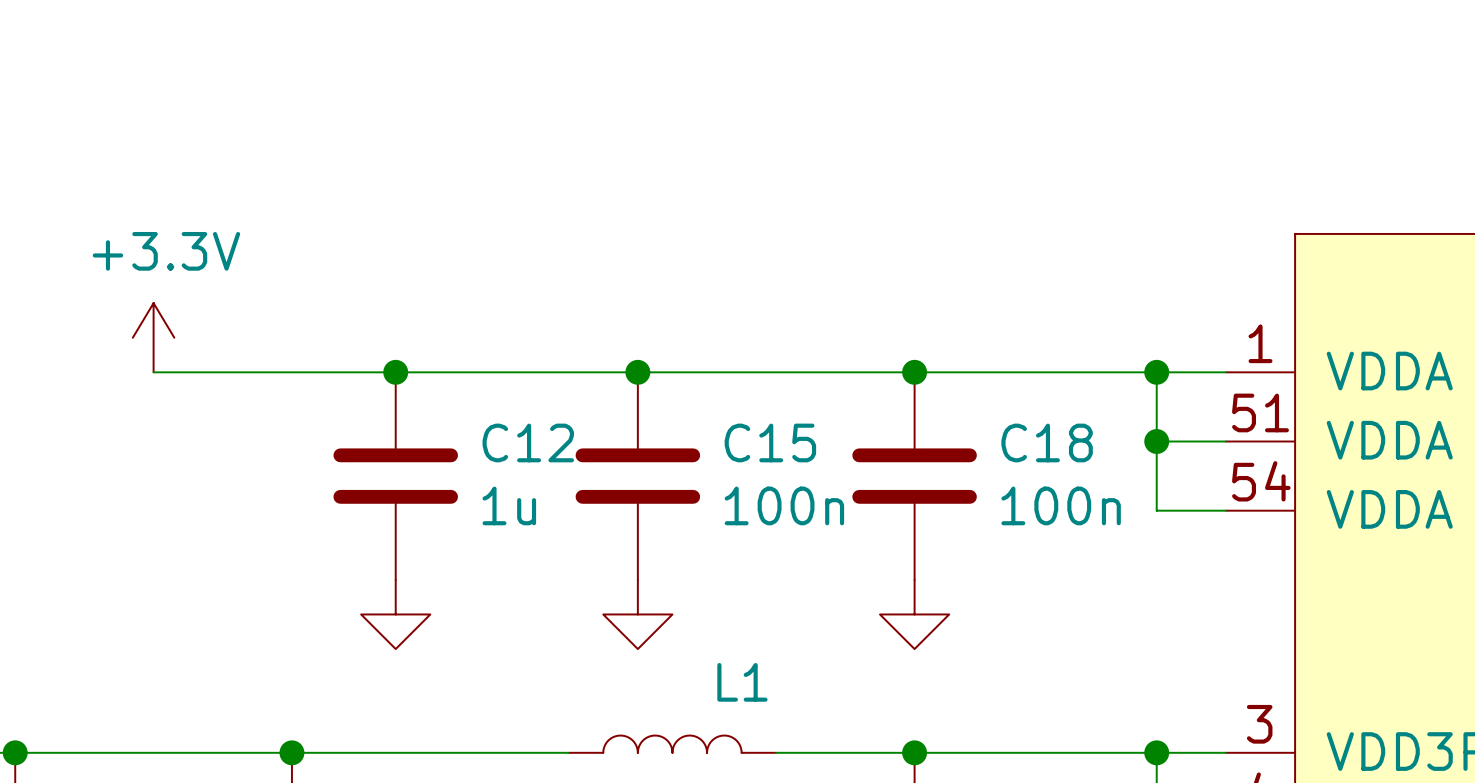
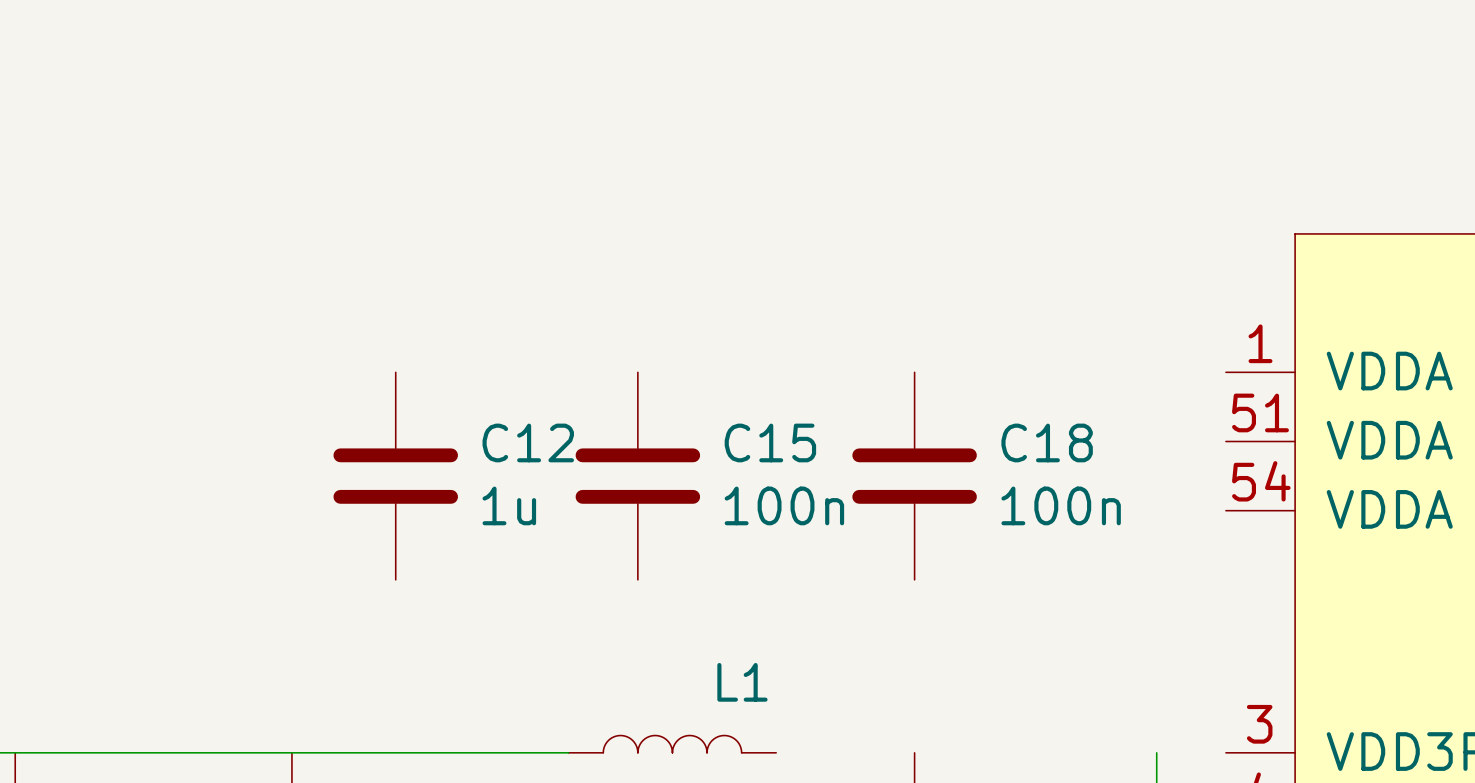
power symbol: +3.3V (153, 337) -> none
wire: (153, 372) (1225, 372) -> none
junction: (395, 372) -> none
junction: (637, 372) -> none
junction: (914, 372) -> none
wire: (1156, 372) (1156, 510) (1225, 510) -> none
junction: (1156, 372) -> none
wire: (1156, 441) (1225, 441) -> none
junction: (1156, 441) -> none
power symbol: (395, 614) -> none
power symbol: (637, 614) -> none
power symbol: (914, 614) -> none
junction: (15, 752) -> none
junction: (291, 752) -> none
wire: (776, 752) (1225, 752) -> none
junction: (914, 752) -> none
junction: (1156, 752) -> none

